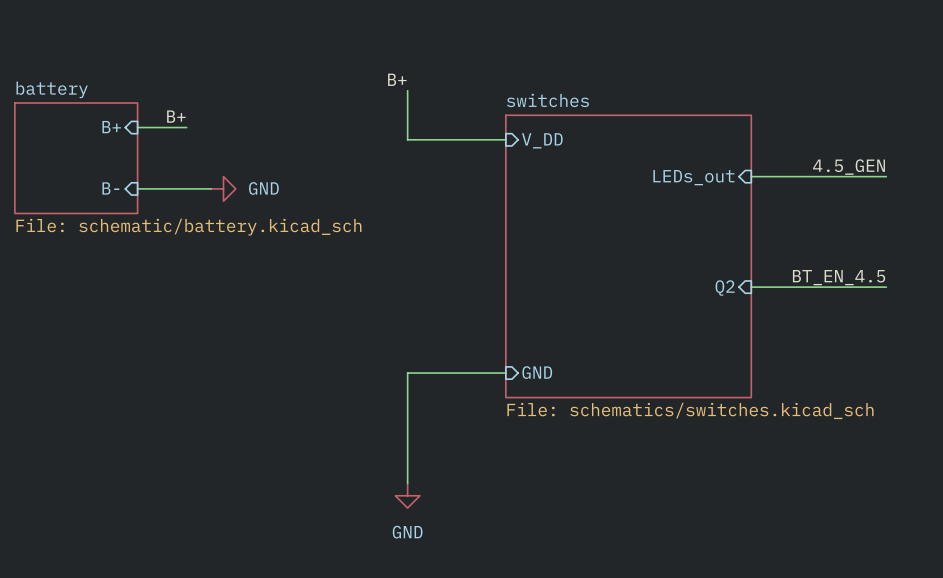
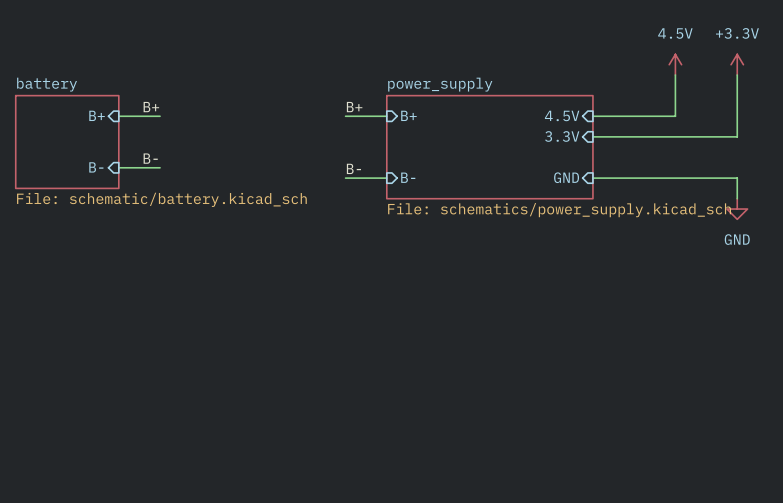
power symbol: none -> 4.5V (675, 64)
power symbol: none -> +3.3V (737, 64)
wire: none -> (675, 75) (675, 116) (592, 116)
wire: none -> (737, 75) (737, 136) (592, 136)
label position: B+ (397, 79) -> B+ (354, 107)
wire: (407, 90) (407, 139) (505, 139) -> none
wire: none -> (345, 116) (386, 116)
sheet pin: none -> B+ (408, 115)
sheet pin: none -> 4.5V (562, 115)
sheet pin: V_DD (542, 140) -> none
sheet pin: none -> 3.3V (562, 136)
sheet power_supply: none -> File: schematics/power_supply.kicad_sch (489, 147)
label: 4.5_GEN (849, 167) -> none
wire: (751, 176) (886, 176) -> none
label: none -> B- (150, 158)
sheet pin: LEDs_out (693, 177) -> none
wire: (186, 188) (211, 188) -> none
power symbol: GND (223, 188) -> none
label: none -> B- (353, 168)
sheet pin: none -> B- (408, 177)
wire: none -> (345, 178) (386, 178)
wire: none -> (592, 178) (737, 178) (737, 198)
power symbol: none -> GND (737, 209)
sheet switches: File: schematics/switches.kicad_sch (628, 256) -> none
label: BT_EN_4.5 (839, 277) -> none
sheet pin: Q2 (725, 287) -> none
wire: (751, 287) (886, 287) -> none
sheet pin rotation: 0° (537, 372) -> 180° (566, 177)
sheet pin position: GND (537, 372) -> GND (566, 177)
wire: (505, 373) (407, 373) (407, 483) -> none
power symbol: GND (407, 495) -> none

